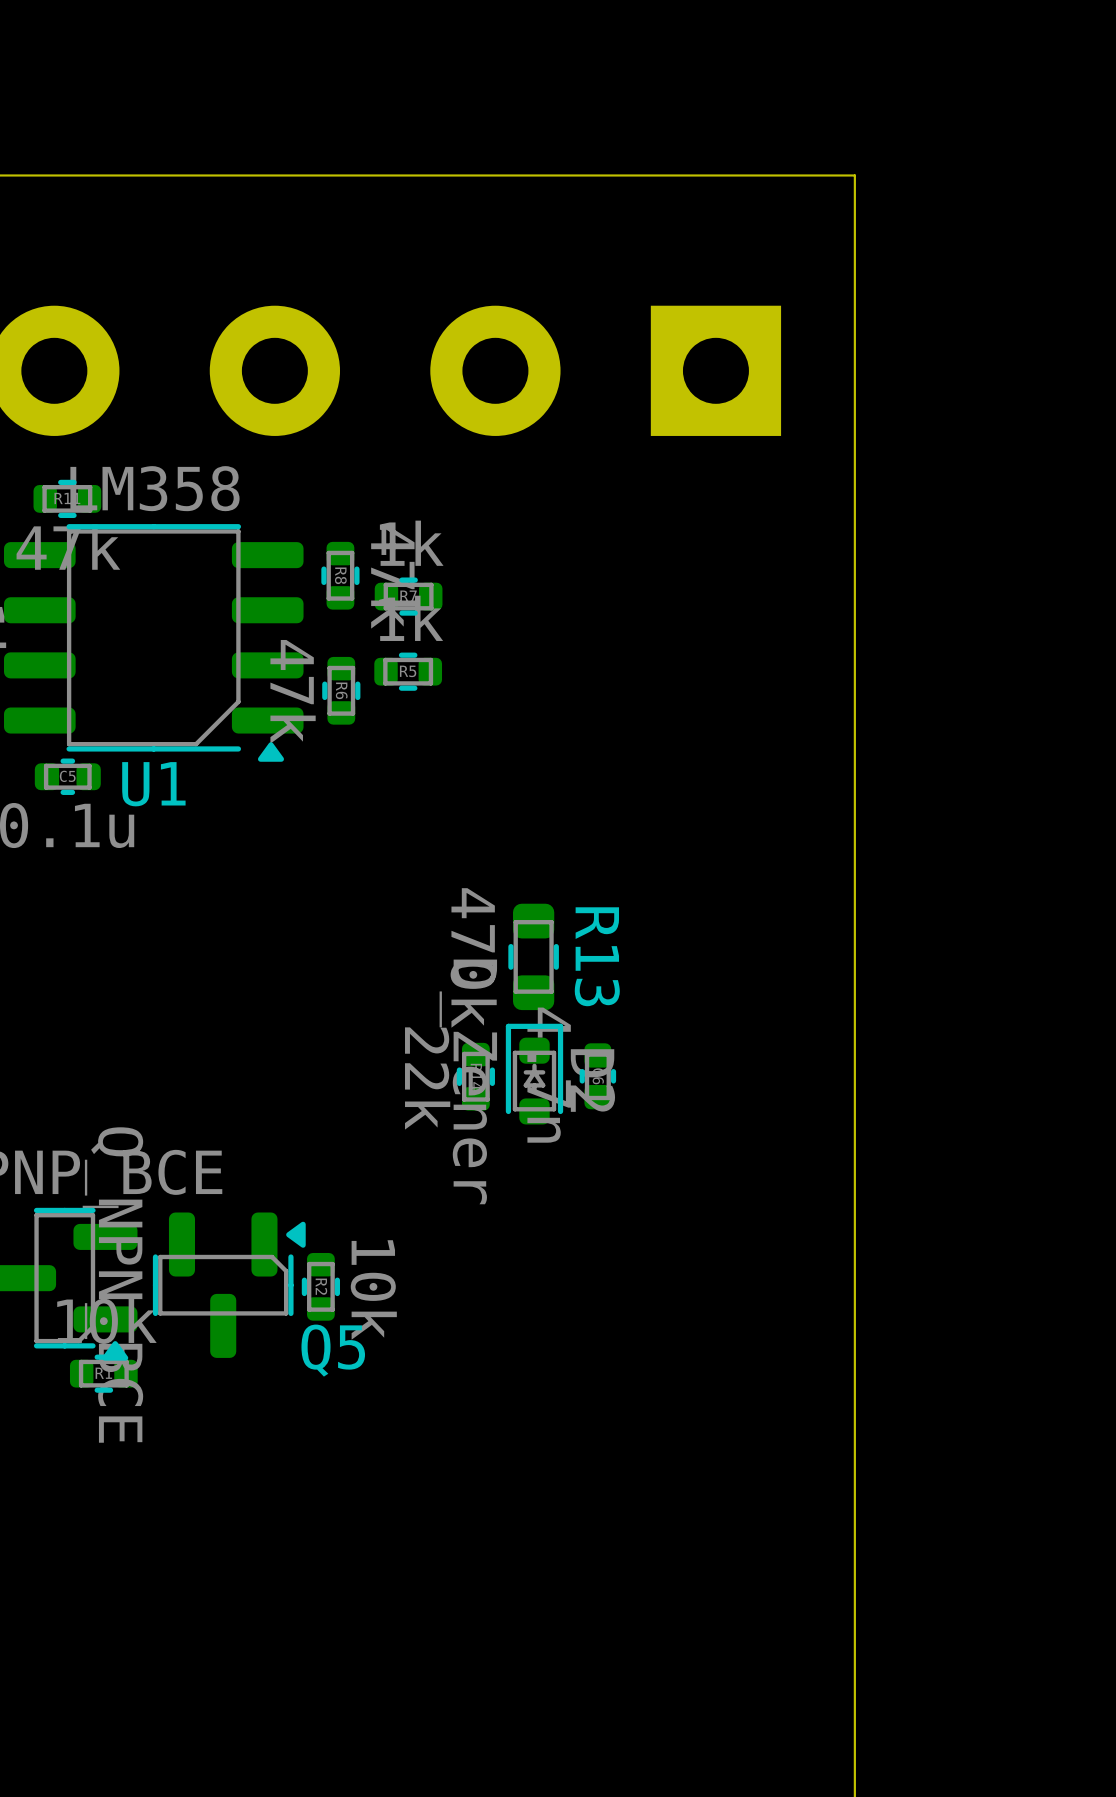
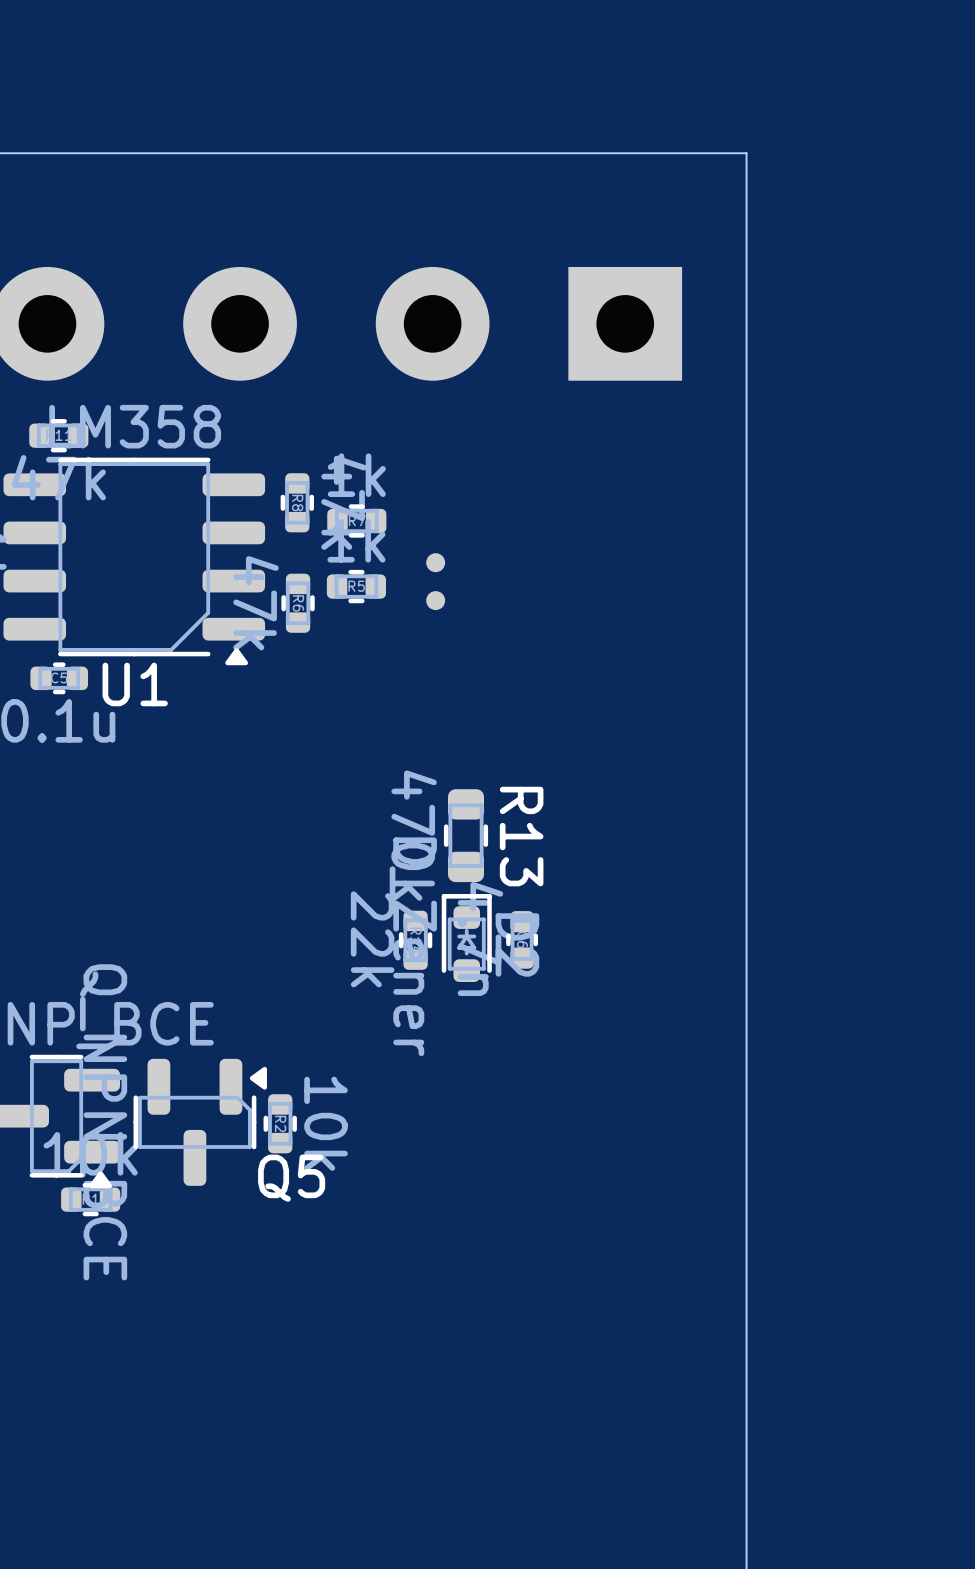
part: none -> (435, 581)

